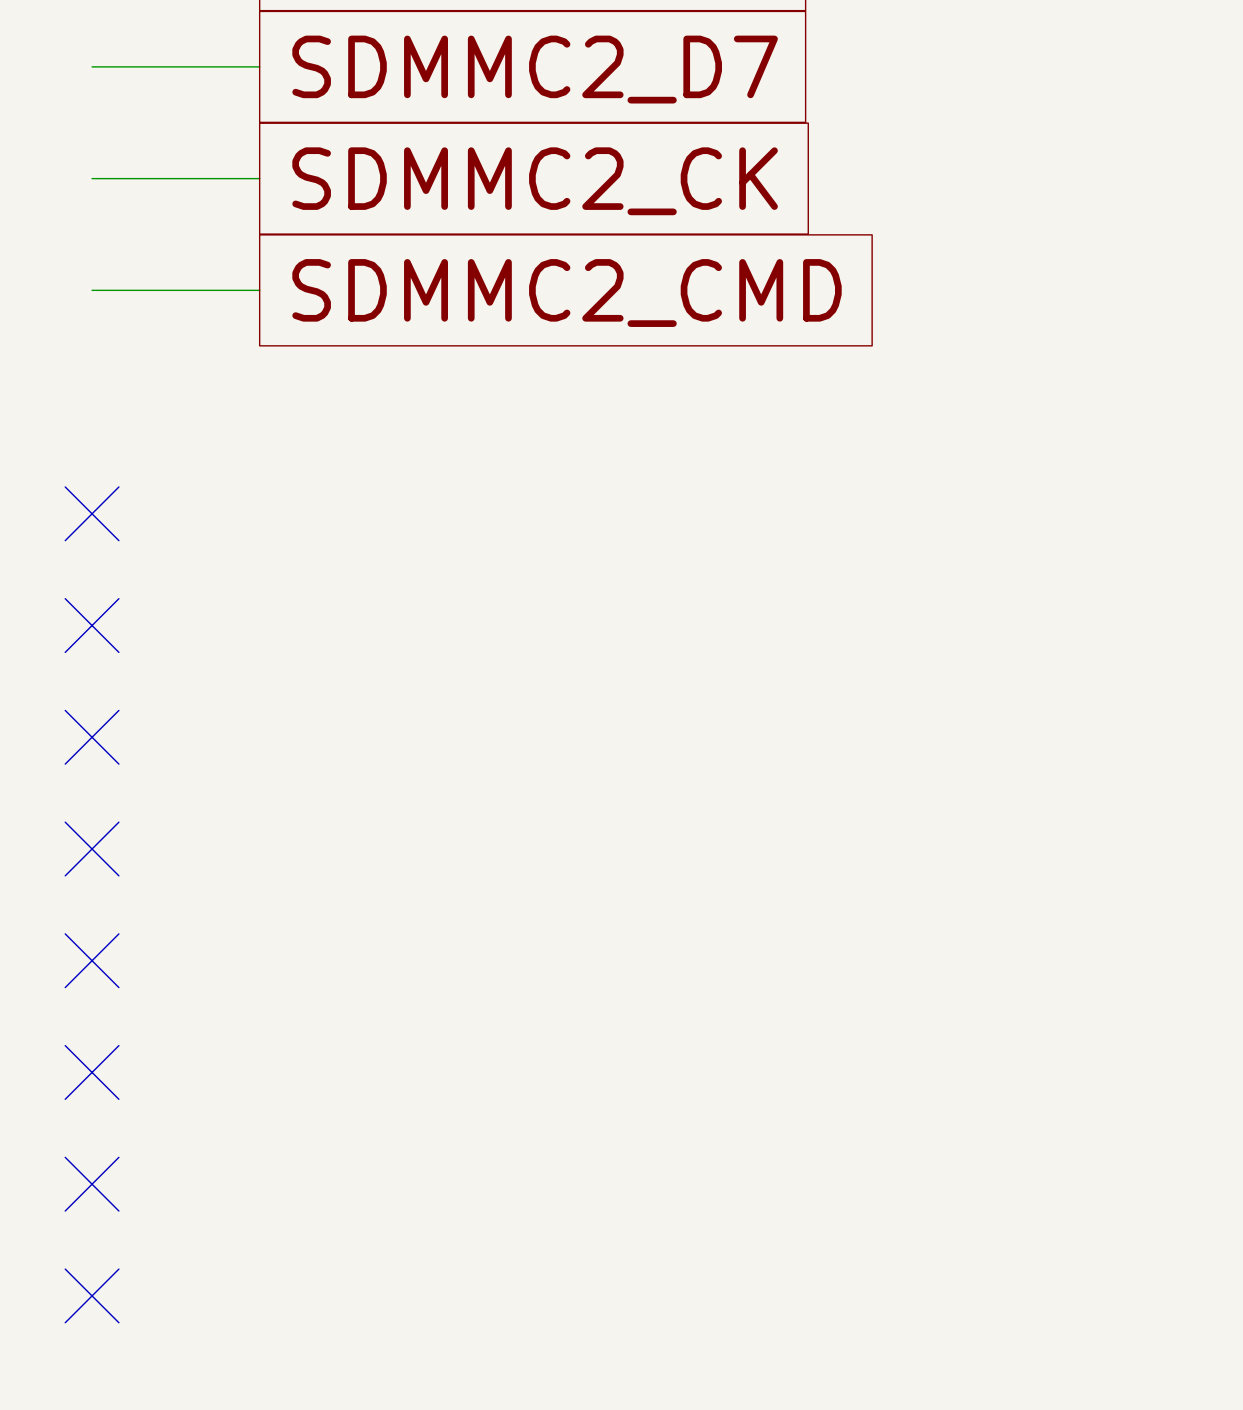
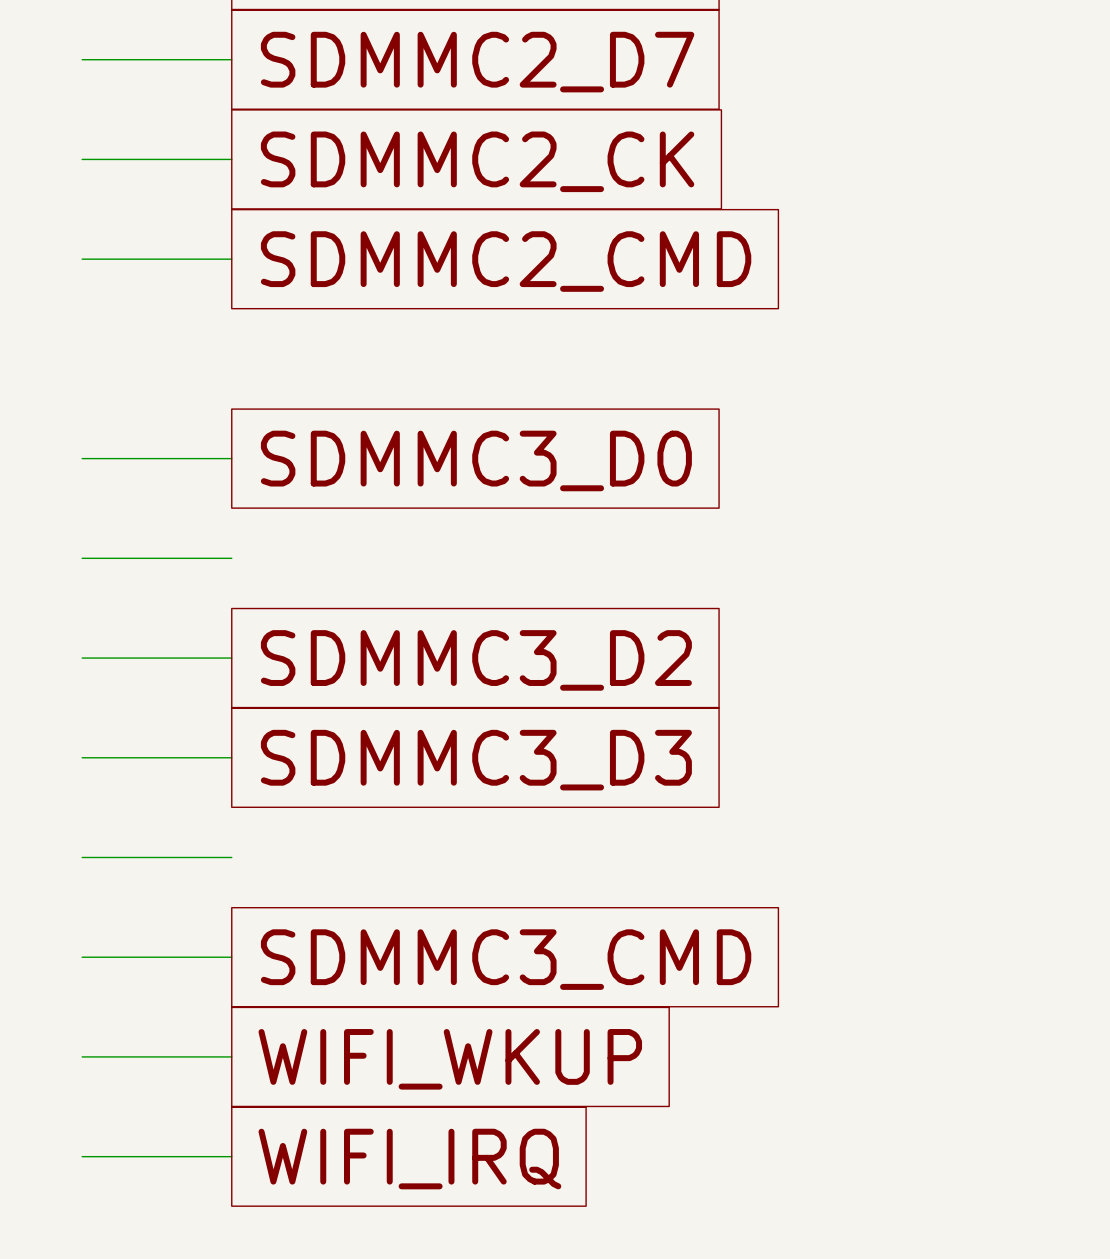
wire: none -> (82, 458) (231, 458)
no-connect mark: (92, 513) -> none
global label: none -> SDMMC3_D0 (476, 460)
wire: none -> (82, 558) (231, 558)
no-connect mark: (92, 625) -> none
wire: none -> (82, 658) (231, 658)
no-connect mark: (92, 737) -> none
global label: none -> SDMMC3_D2 (476, 660)
wire: none -> (82, 757) (231, 757)
no-connect mark: (92, 849) -> none
global label: none -> SDMMC3_D3 (476, 760)
wire: none -> (82, 857) (231, 857)
no-connect mark: (92, 960) -> none
wire: none -> (82, 957) (231, 957)
no-connect mark: (92, 1072) -> none
global label: none -> SDMMC3_CMD (506, 959)
wire: none -> (82, 1056) (231, 1056)
no-connect mark: (92, 1184) -> none
global label: none -> WIFI_WKUP (450, 1059)
wire: none -> (82, 1156) (231, 1156)
no-connect mark: (92, 1295) -> none
global label: none -> WIFI_IRQ (409, 1159)

